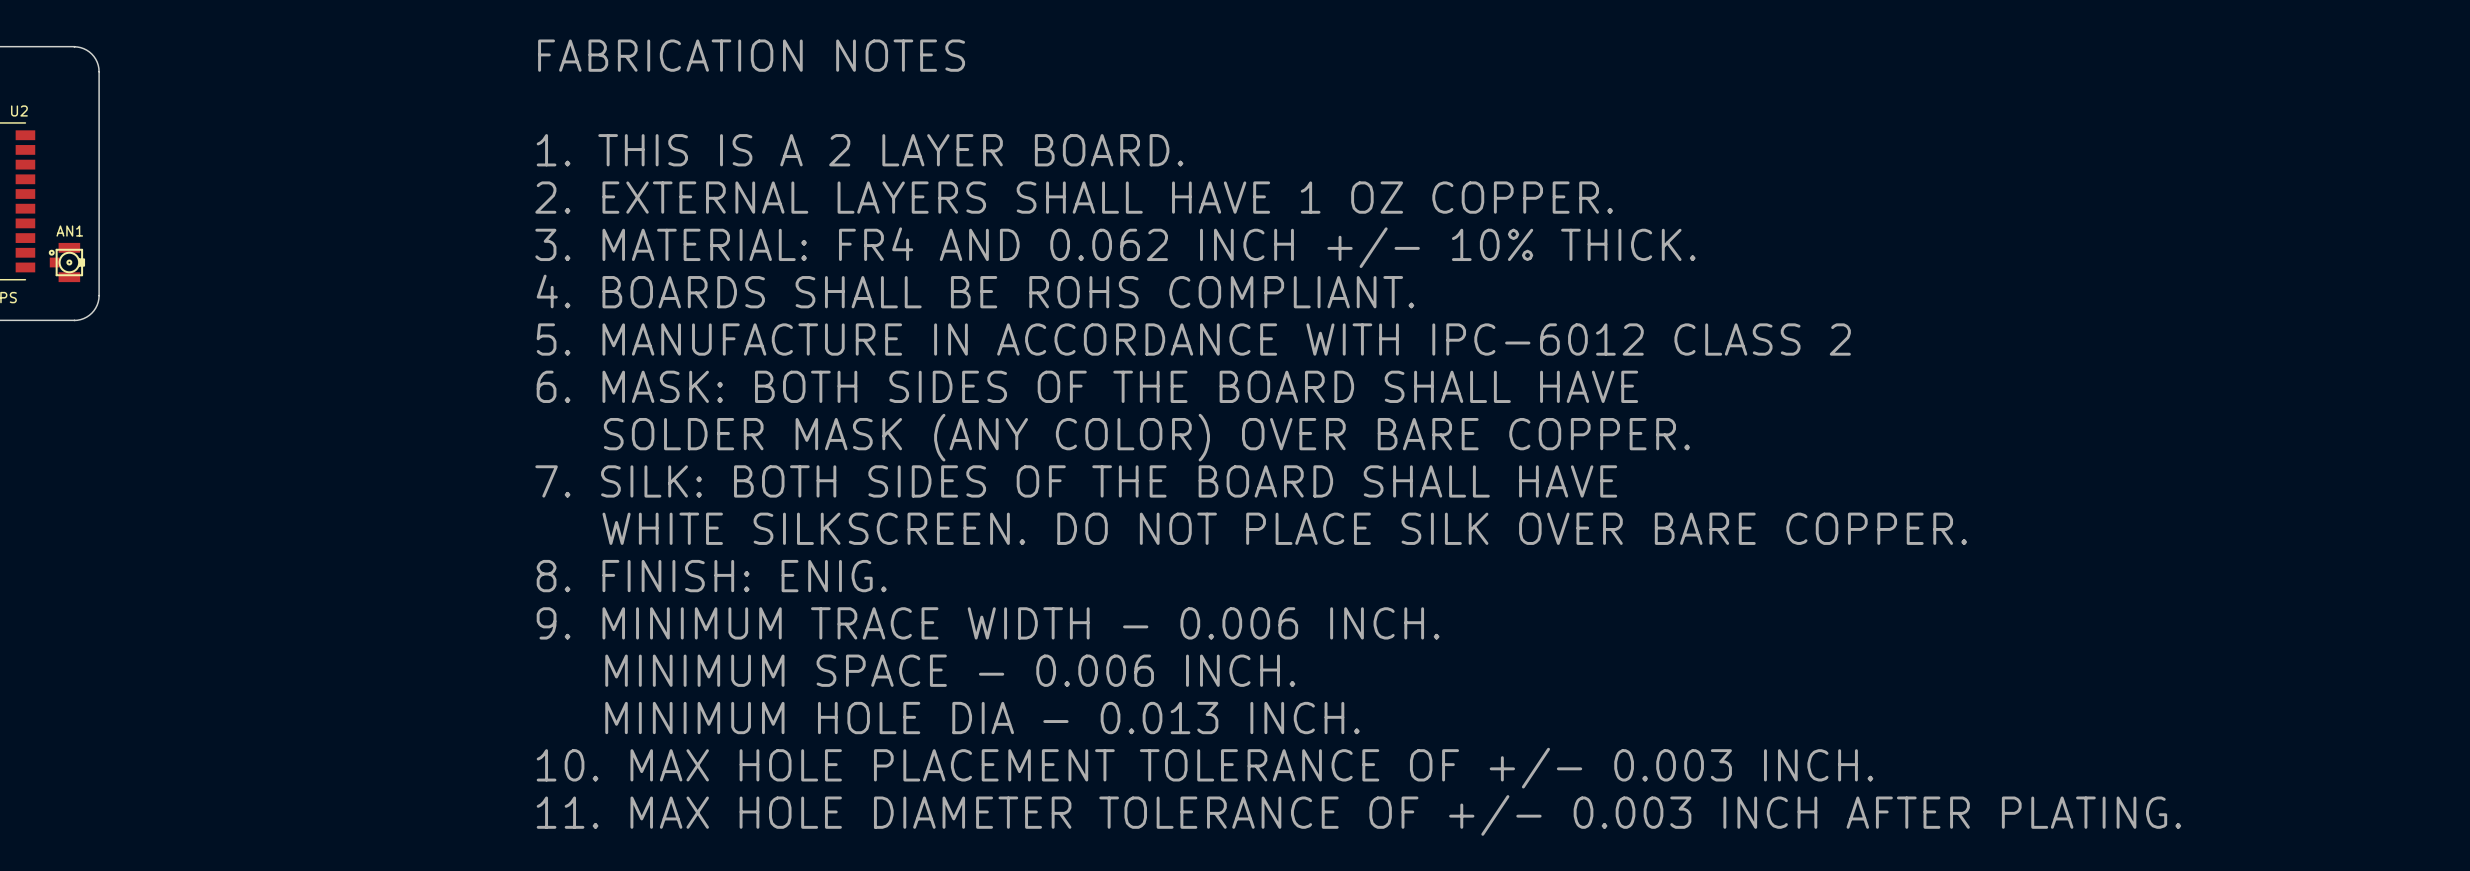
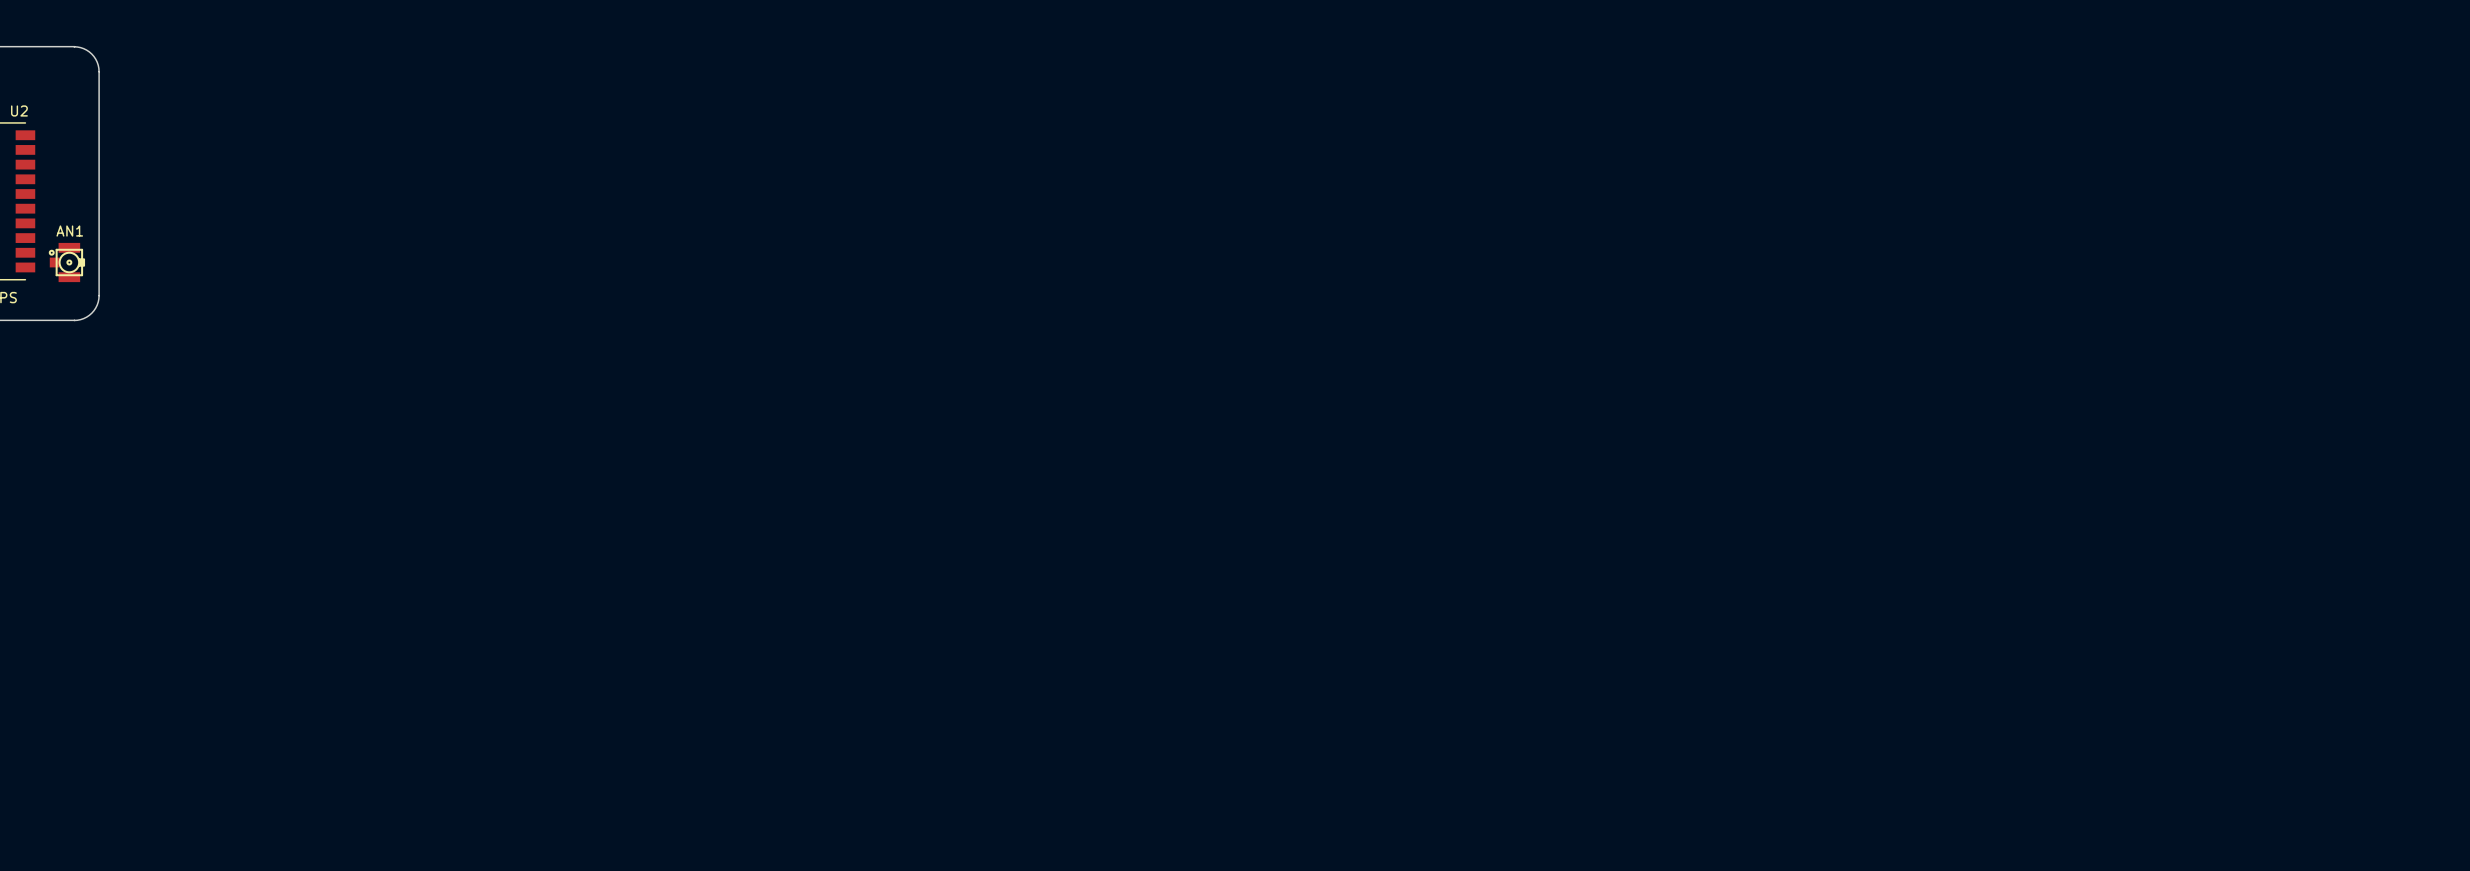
text: FABRICATION NOTES (751, 55) -> none
text: 1. THIS IS A 2 LAYER BOARD. (860, 150) -> none
text: 2. EXTERNAL LAYERS SHALL HAVE 1 OZ COPPER. (1074, 197) -> none
text: 3. MATERIAL: FR4 AND 0.062 INCH +/- 10% THICK. (1115, 247) -> none
text: 4. BOARDS SHALL BE ROHS COMPLIANT. (975, 291) -> none
text: 5. MANUFACTURE IN ACCORDANCE WITH IPC-6012 CLASS 2 (1193, 339) -> none
text: 6. MASK: BOTH SIDES OF THE BOARD SHALL HAVE (1087, 386) -> none
text: SOLDER MASK (ANY COLOR) OVER BARE COPPER. (1146, 437) -> none
text: 7. SILK: BOTH SIDES OF THE BOARD SHALL HAVE (1076, 481) -> none
text: WHITE SILKSCREEN. DO NOT PLACE SILK OVER BARE COPPER. (1284, 528) -> none
text: 8. FINISH: ENIG. (711, 576) -> none
text: 9. MINIMUM TRACE WIDTH - 0.006 INCH. (988, 623) -> none
text: MINIMUM SPACE - 0.006 INCH. (950, 670) -> none
text: MINIMUM HOLE DIA - 0.013 INCH. (982, 718) -> none
text: 10. MAX HOLE PLACEMENT TOLERANCE OF +/- 0.003 INCH. (1204, 768) -> none
text: 11. MAX HOLE DIAMETER TOLERANCE OF +/- 0.003 INCH AFTER PLATING. (1358, 815) -> none

